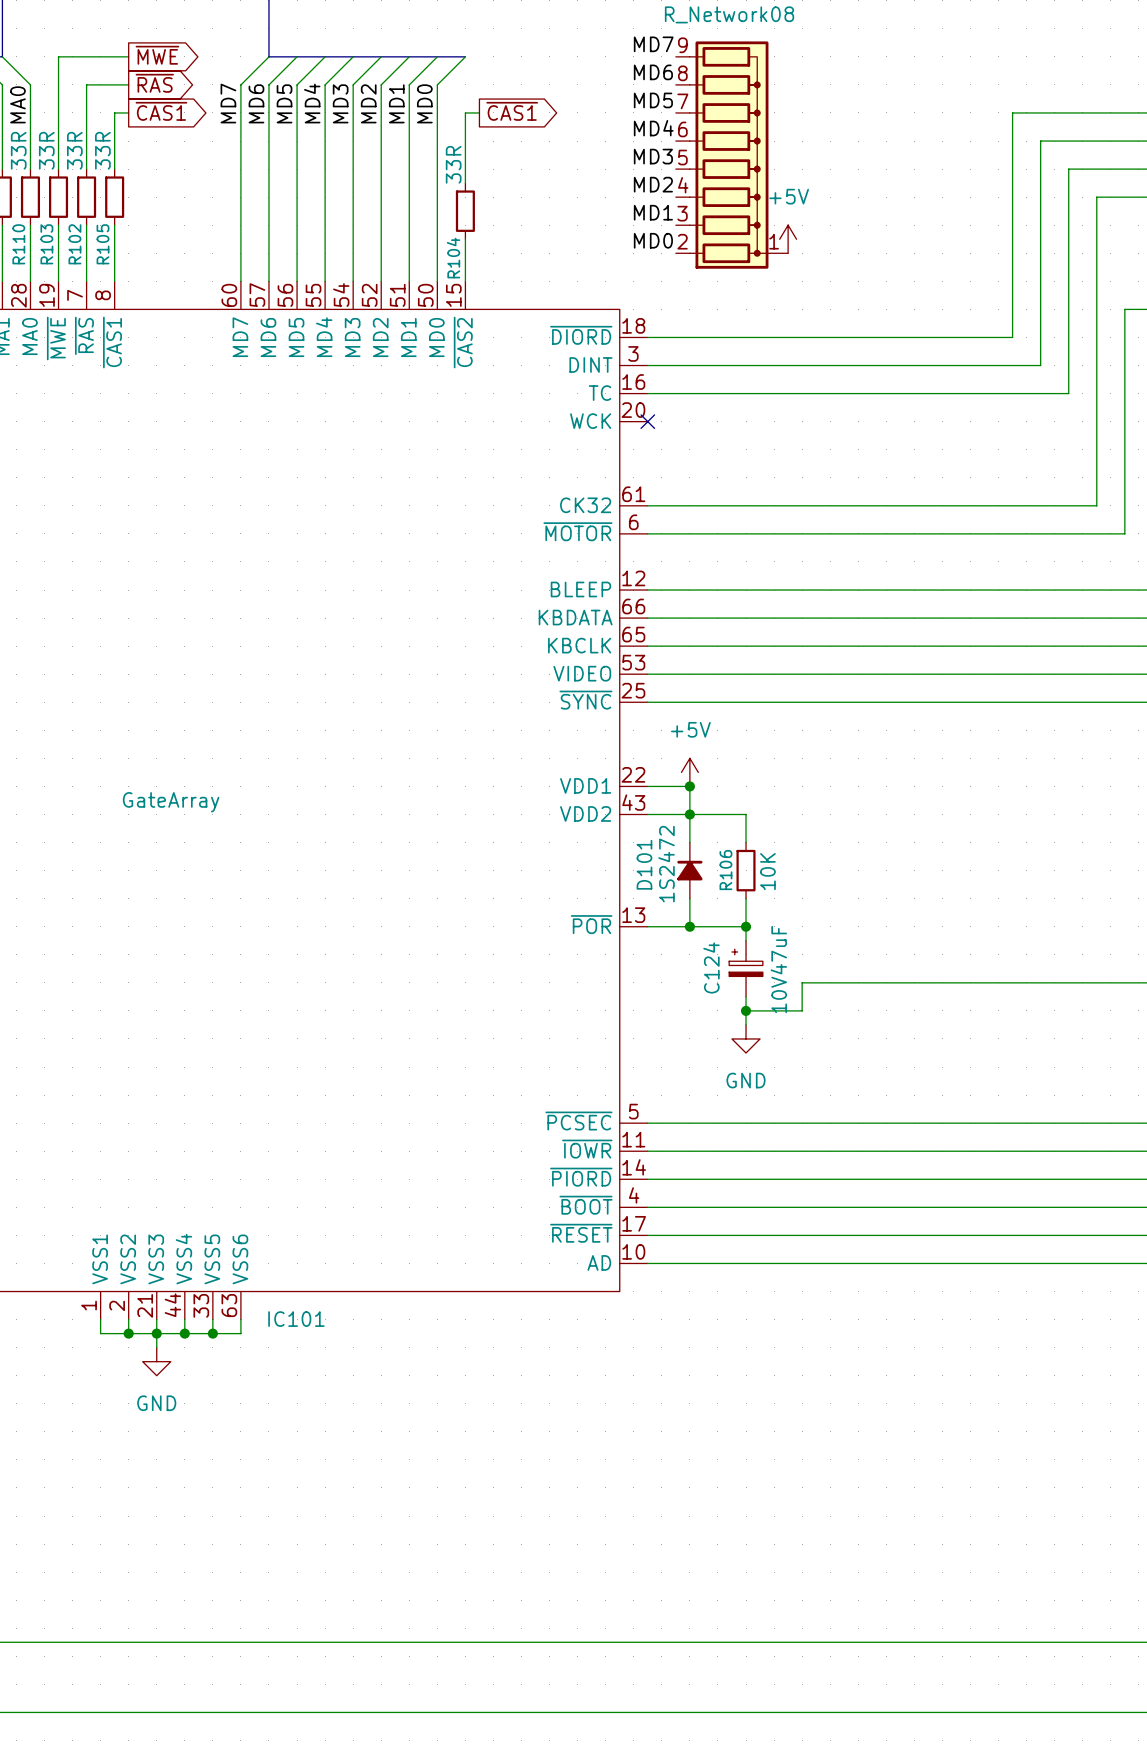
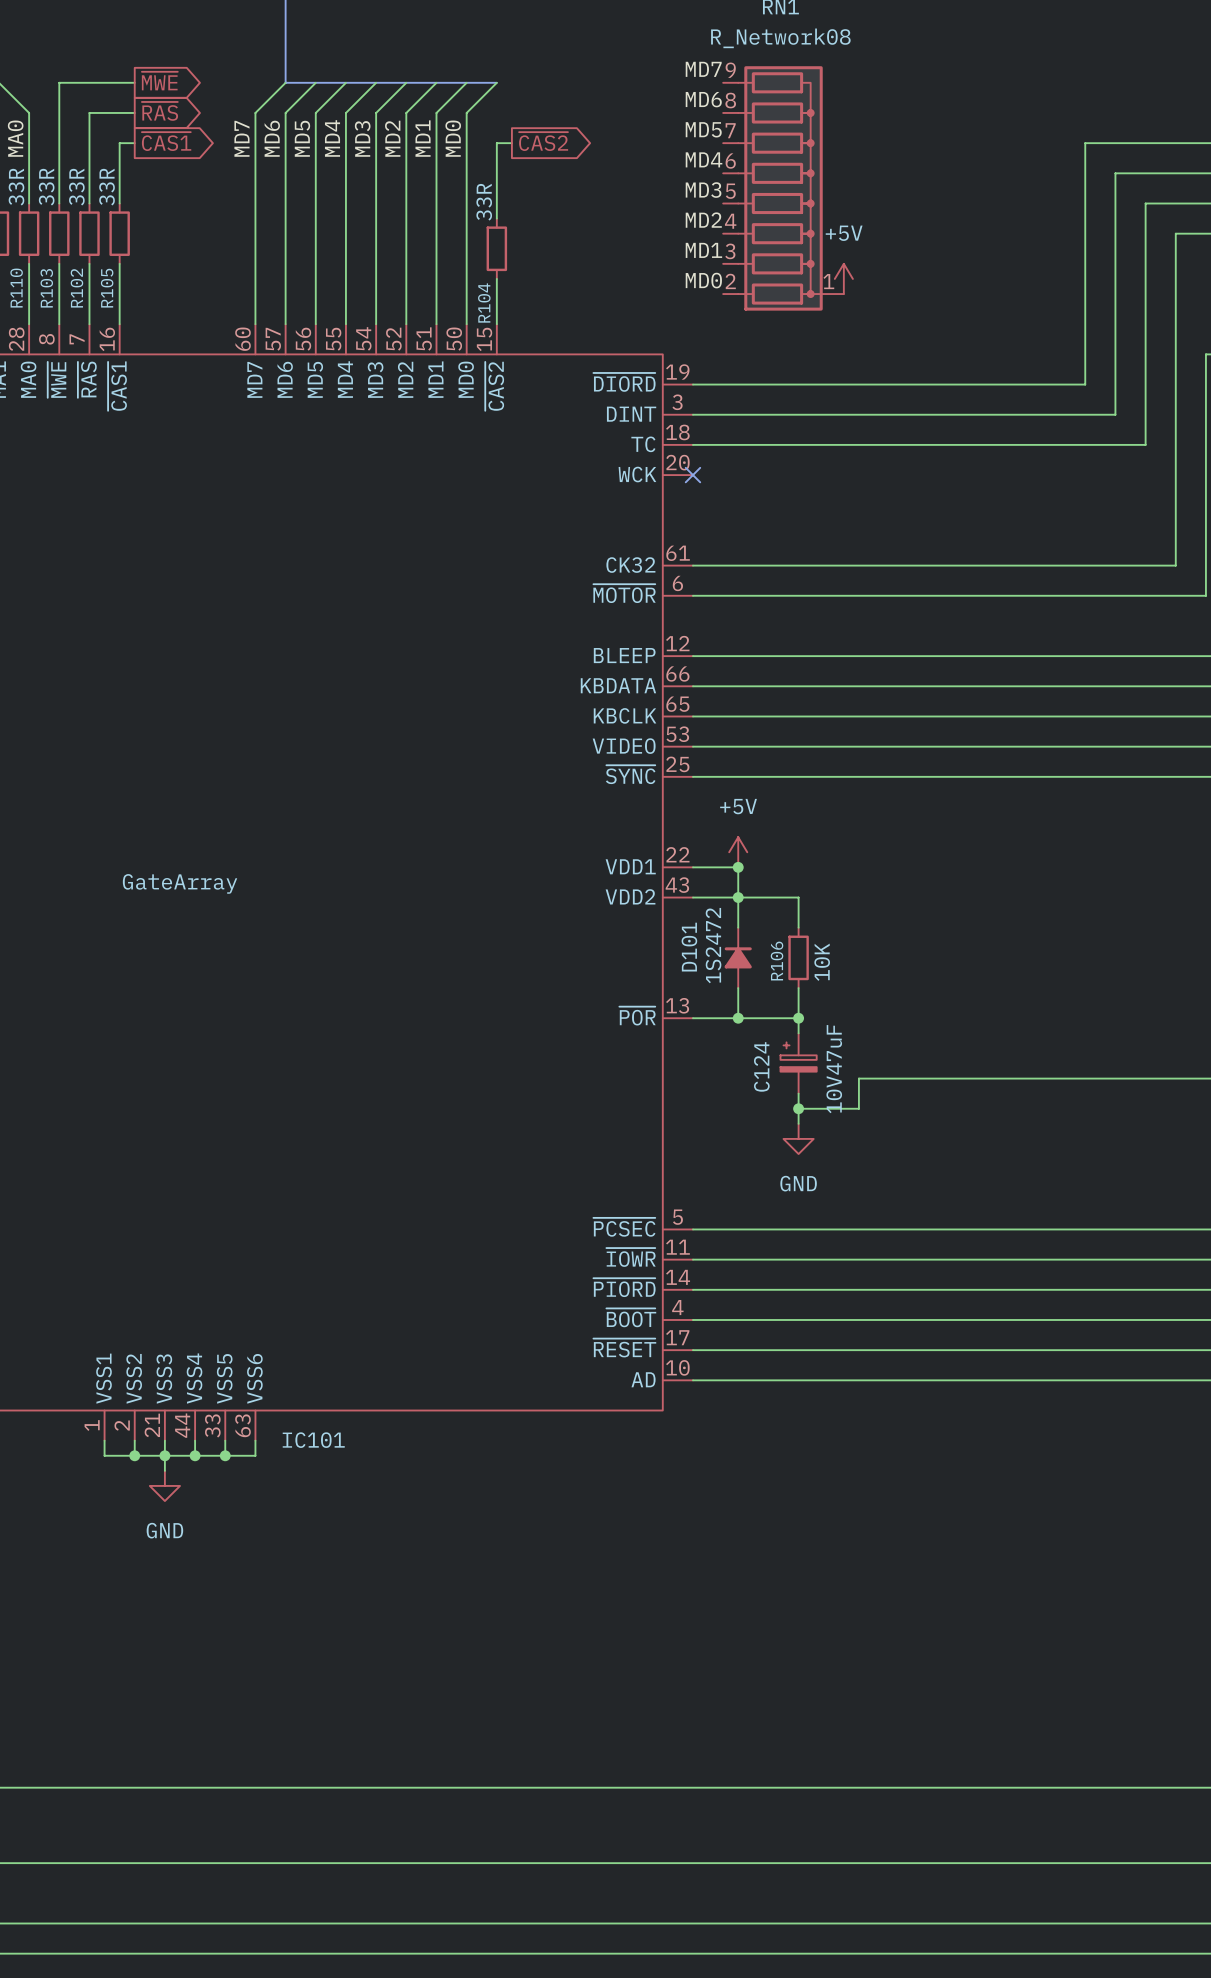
global label: ~{CAS1} (512, 111) -> ~{CAS2} (543, 141)
IC101 pin number: 19 (46, 295) -> 8 (46, 339)
IC101 pin number: 8 (103, 295) -> 16 (107, 339)
IC101 pin number: 18 (633, 325) -> 19 (677, 371)
IC101 pin number: 16 (633, 382) -> 18 (677, 432)

